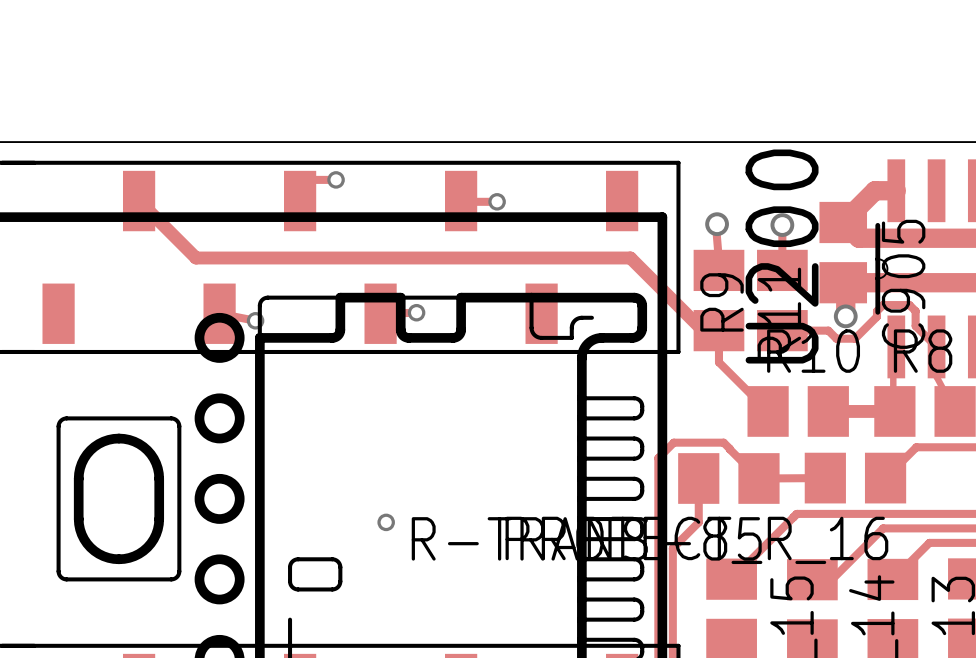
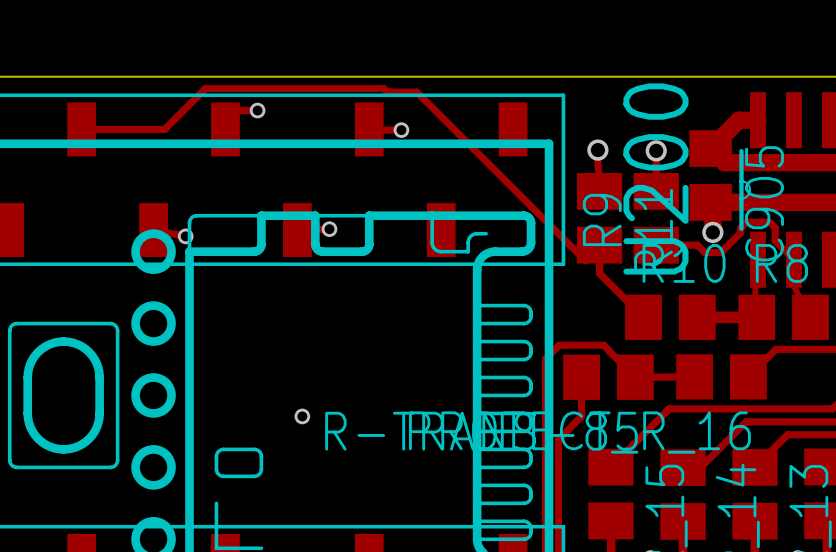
track: (139, 201) (196, 257) (630, 257) (703, 330) (718, 330) -> (81, 129) (164, 129) (205, 88) (383, 88) (387, 92) (416, 92) (585, 260) (599, 246)

